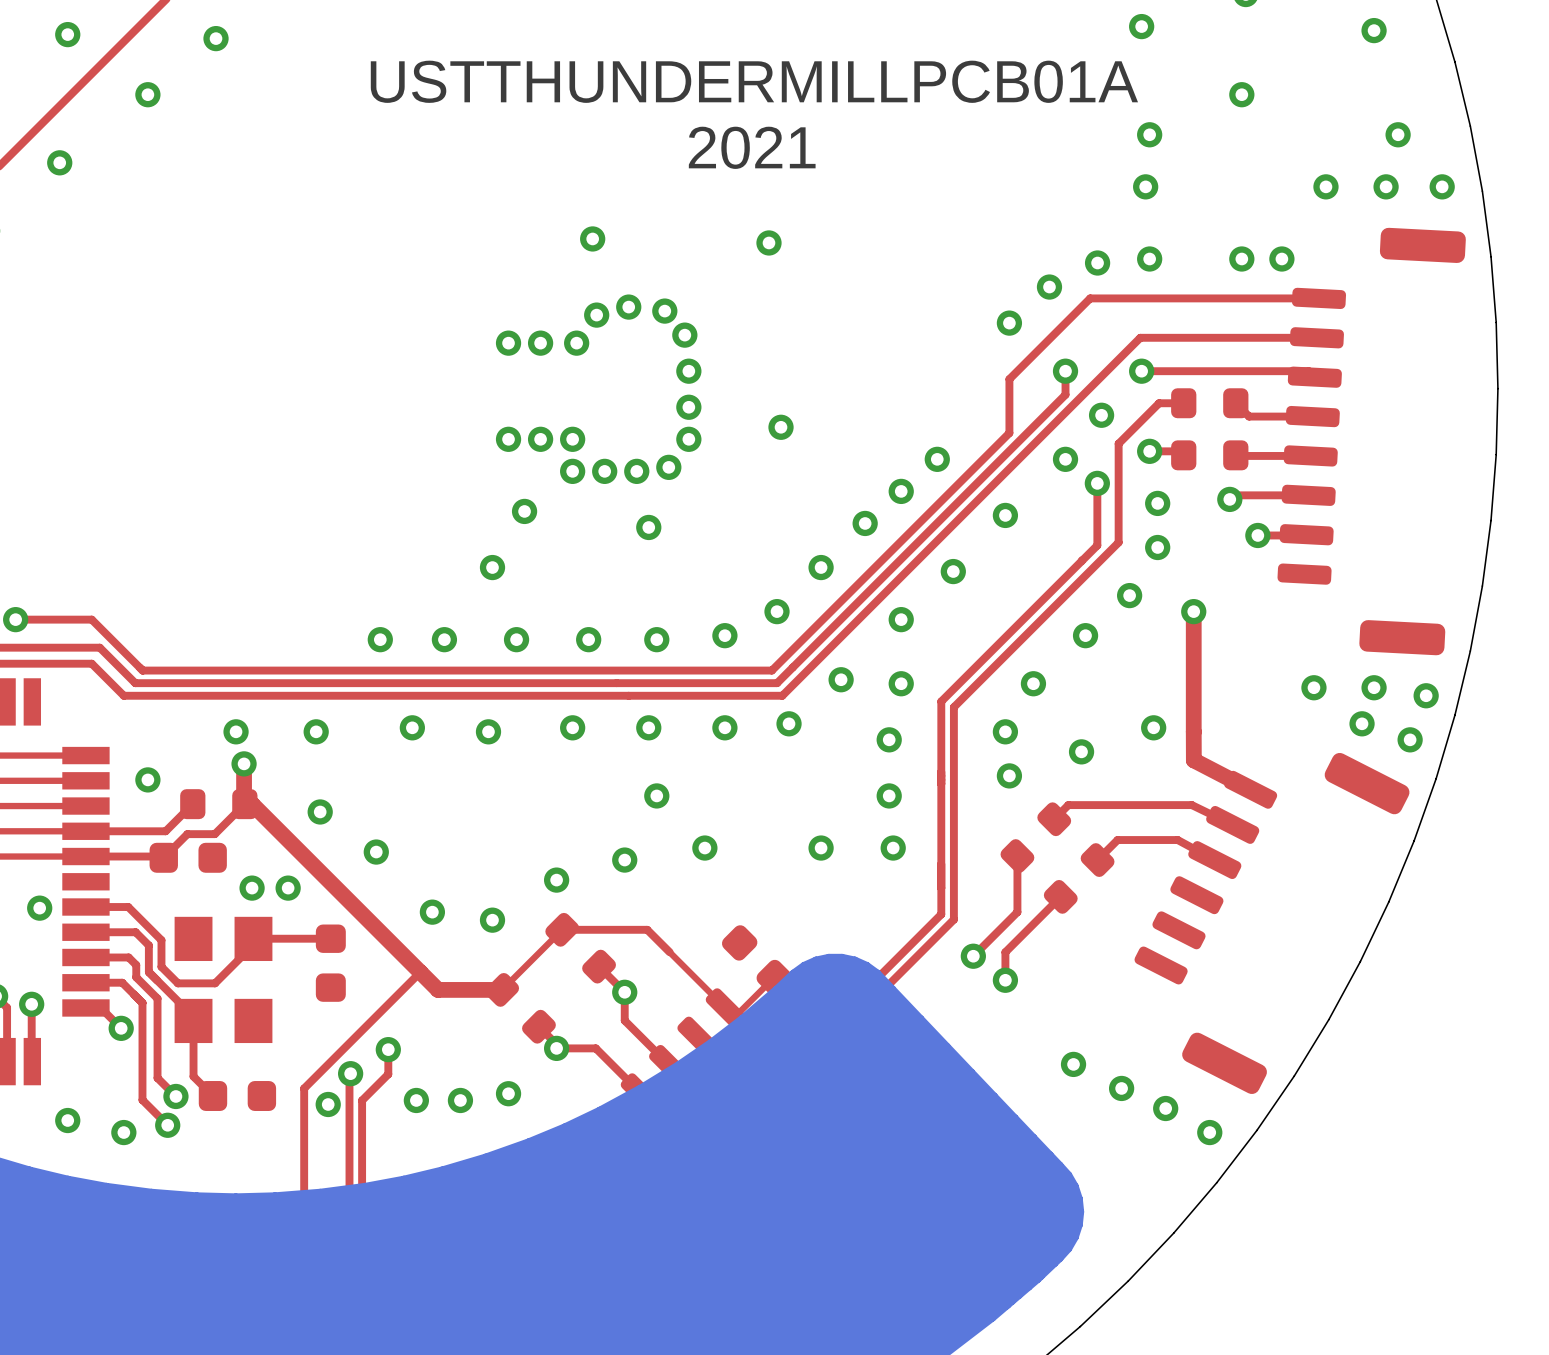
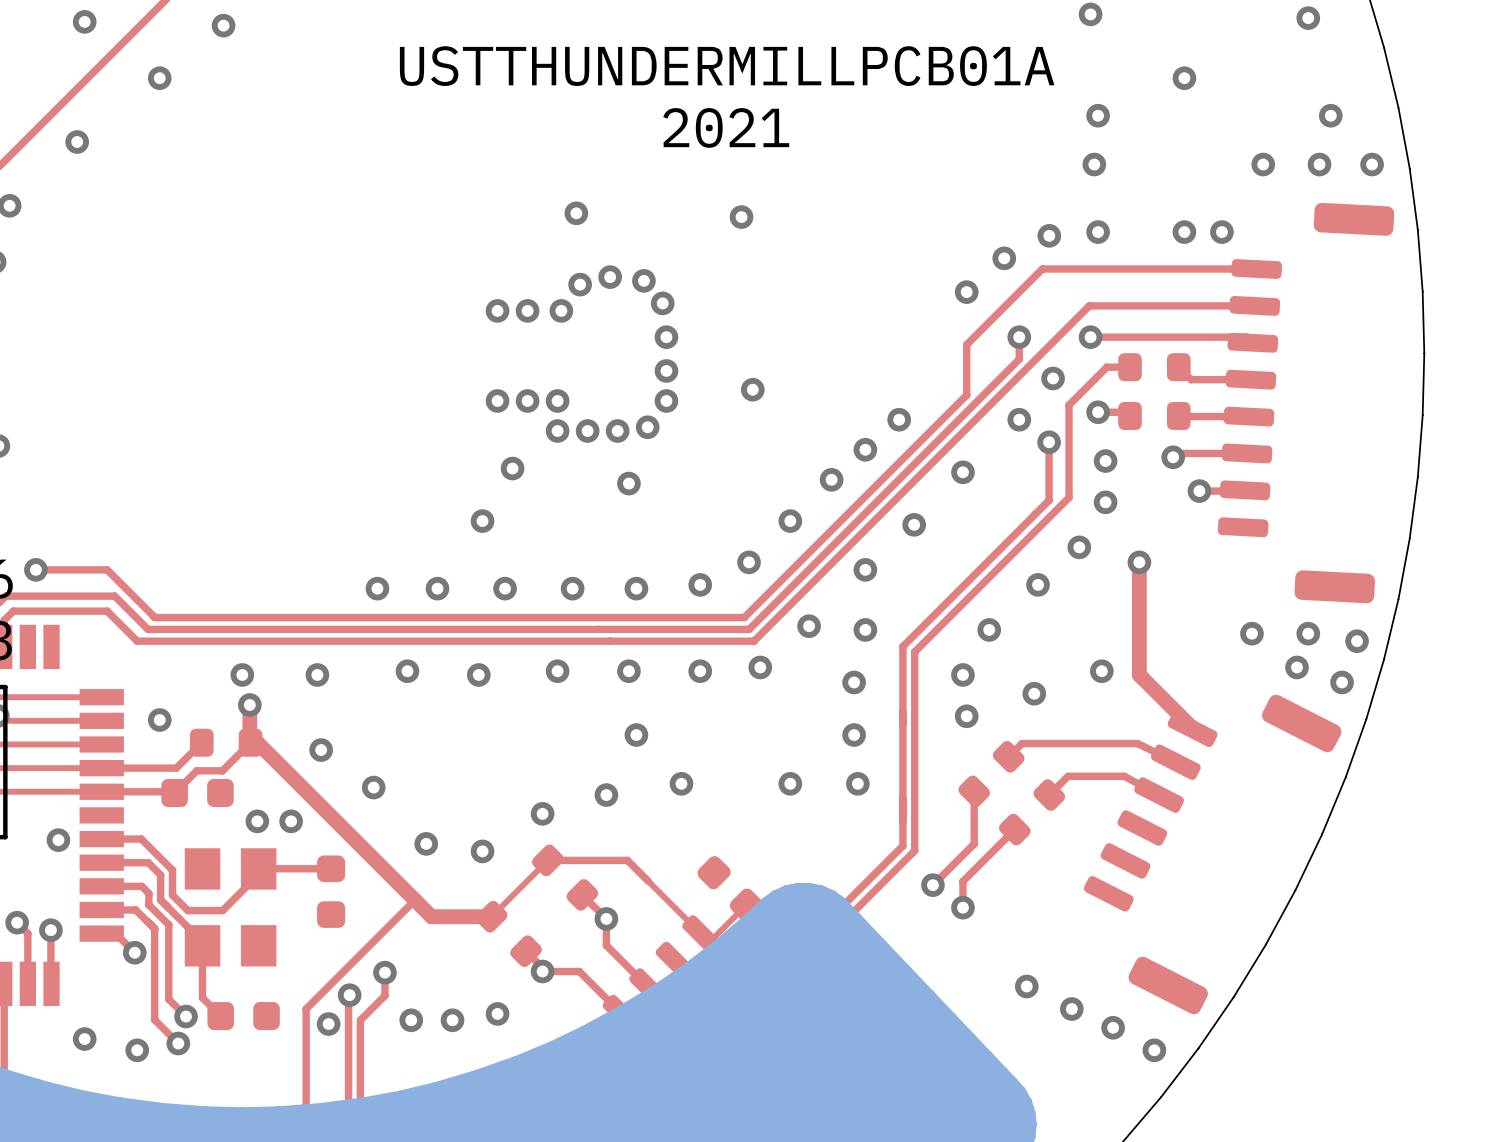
top track: (1193, 731) (1193, 760) (1250, 789) -> (1139, 674) (1192, 729)

